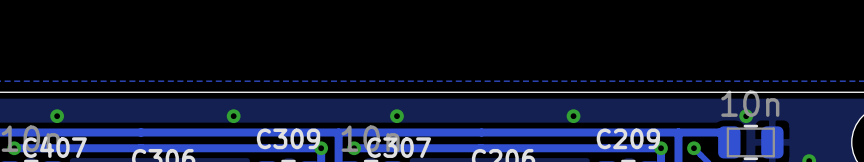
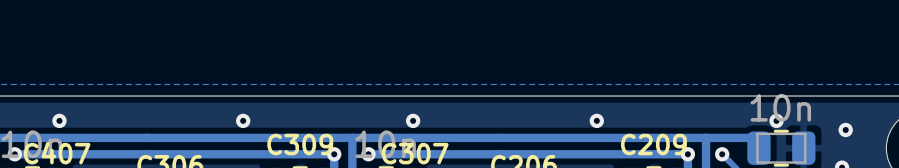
via: none -> (845, 130)

